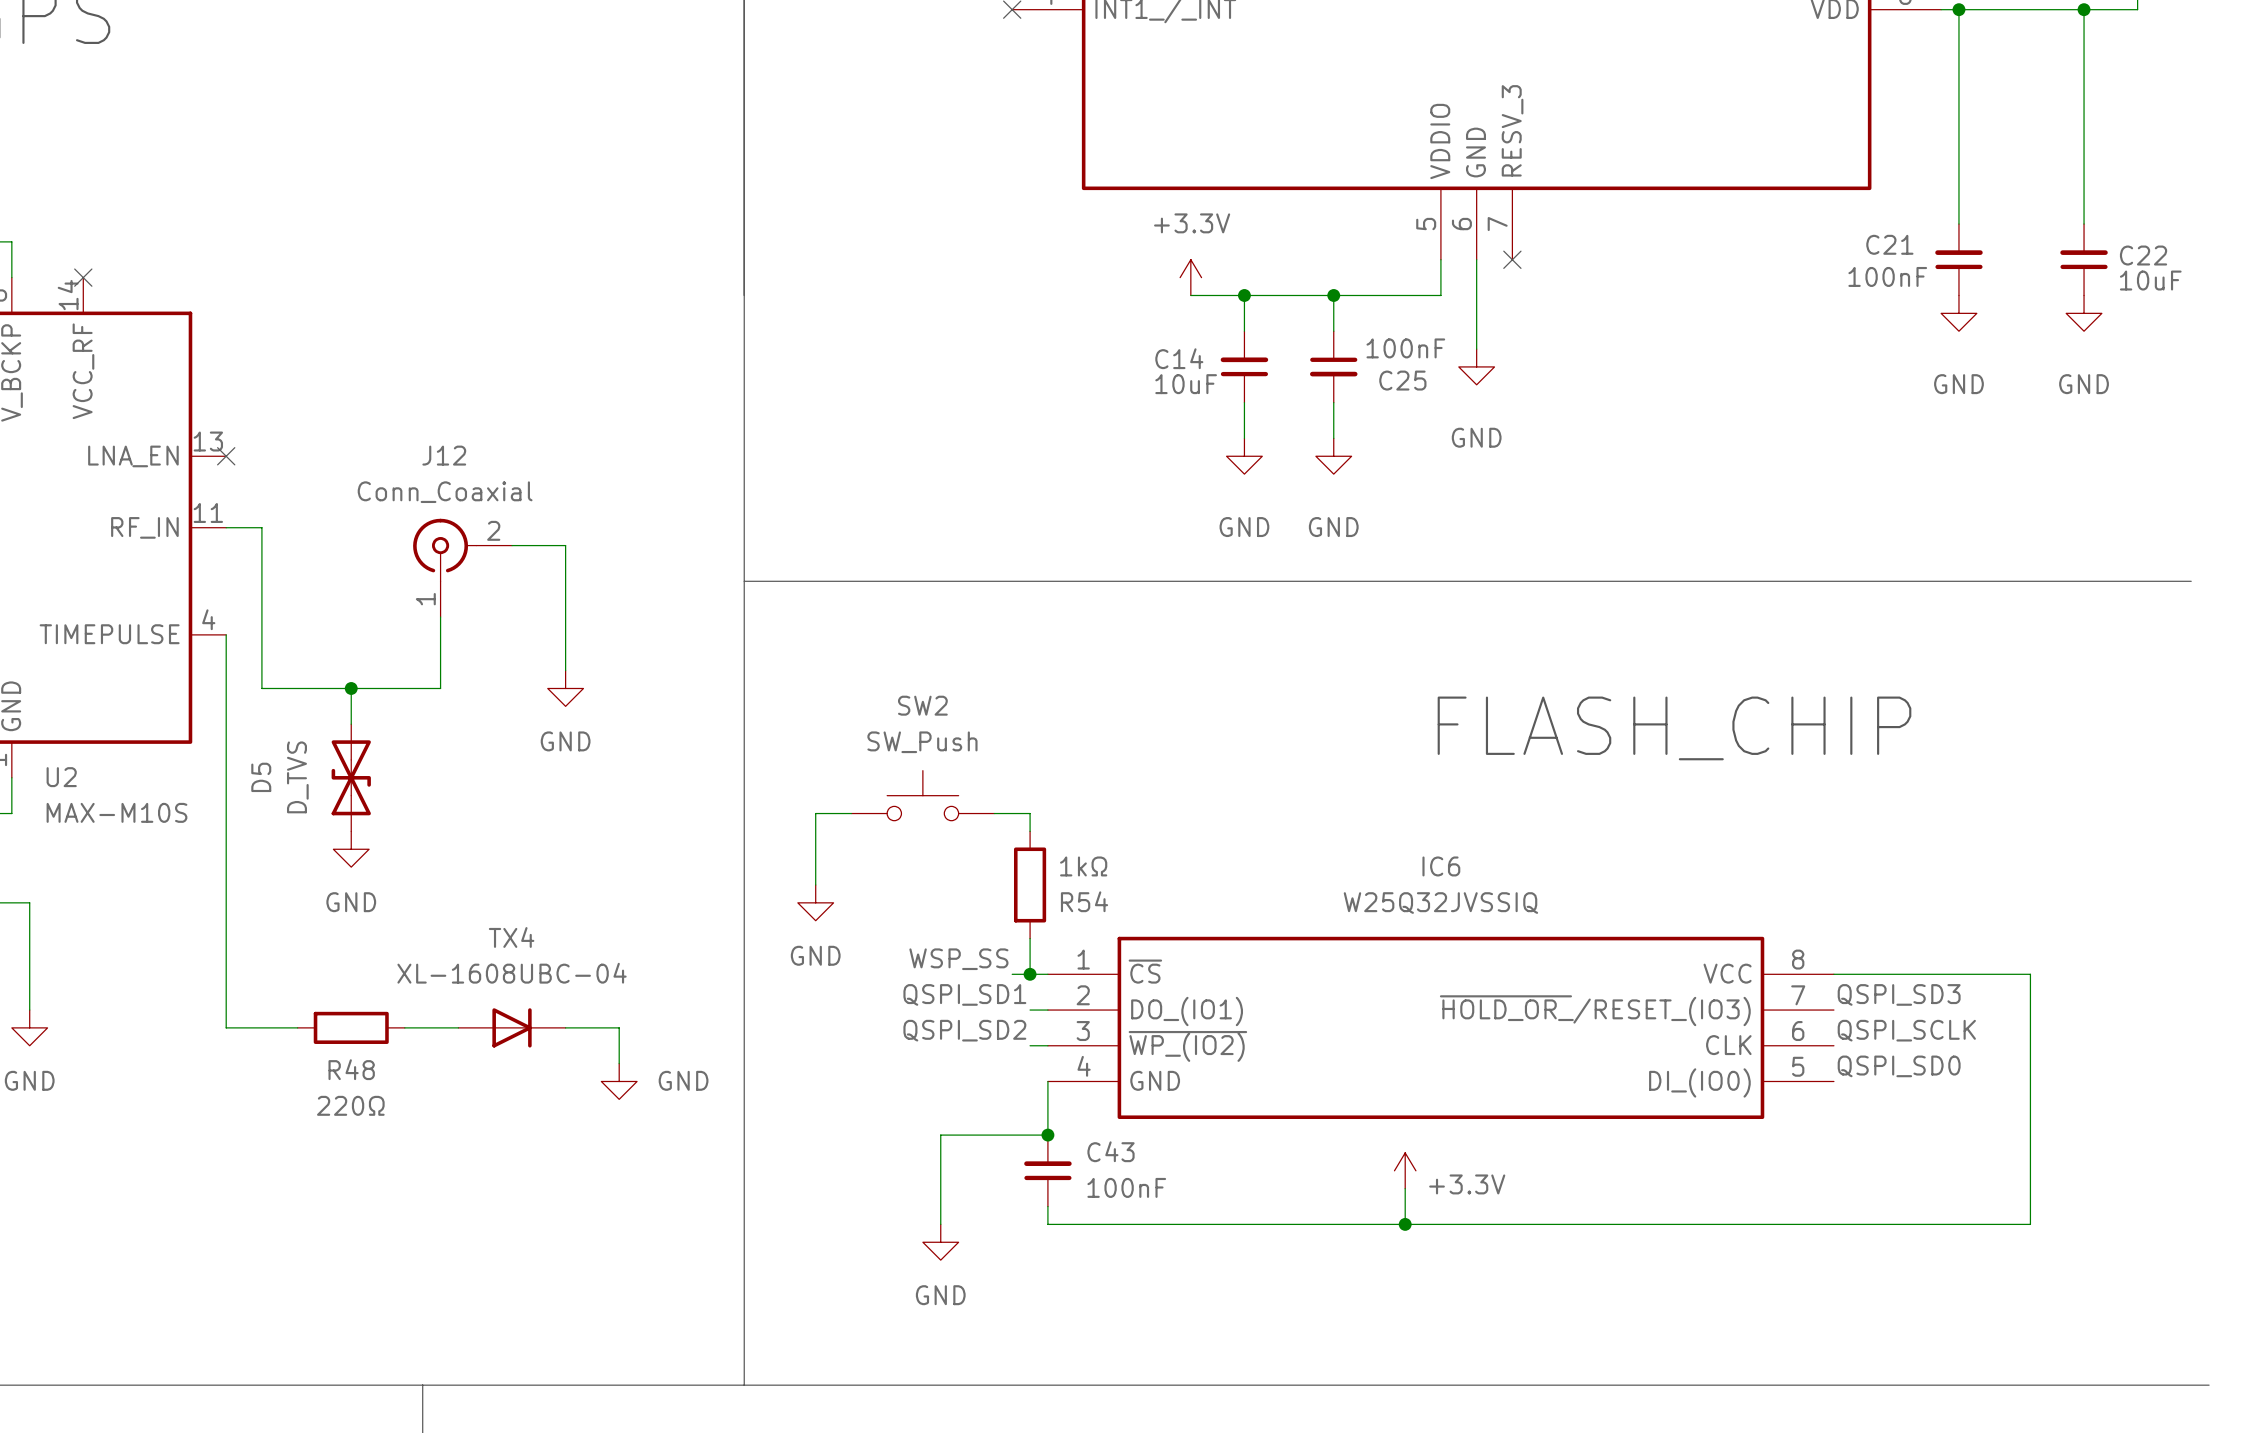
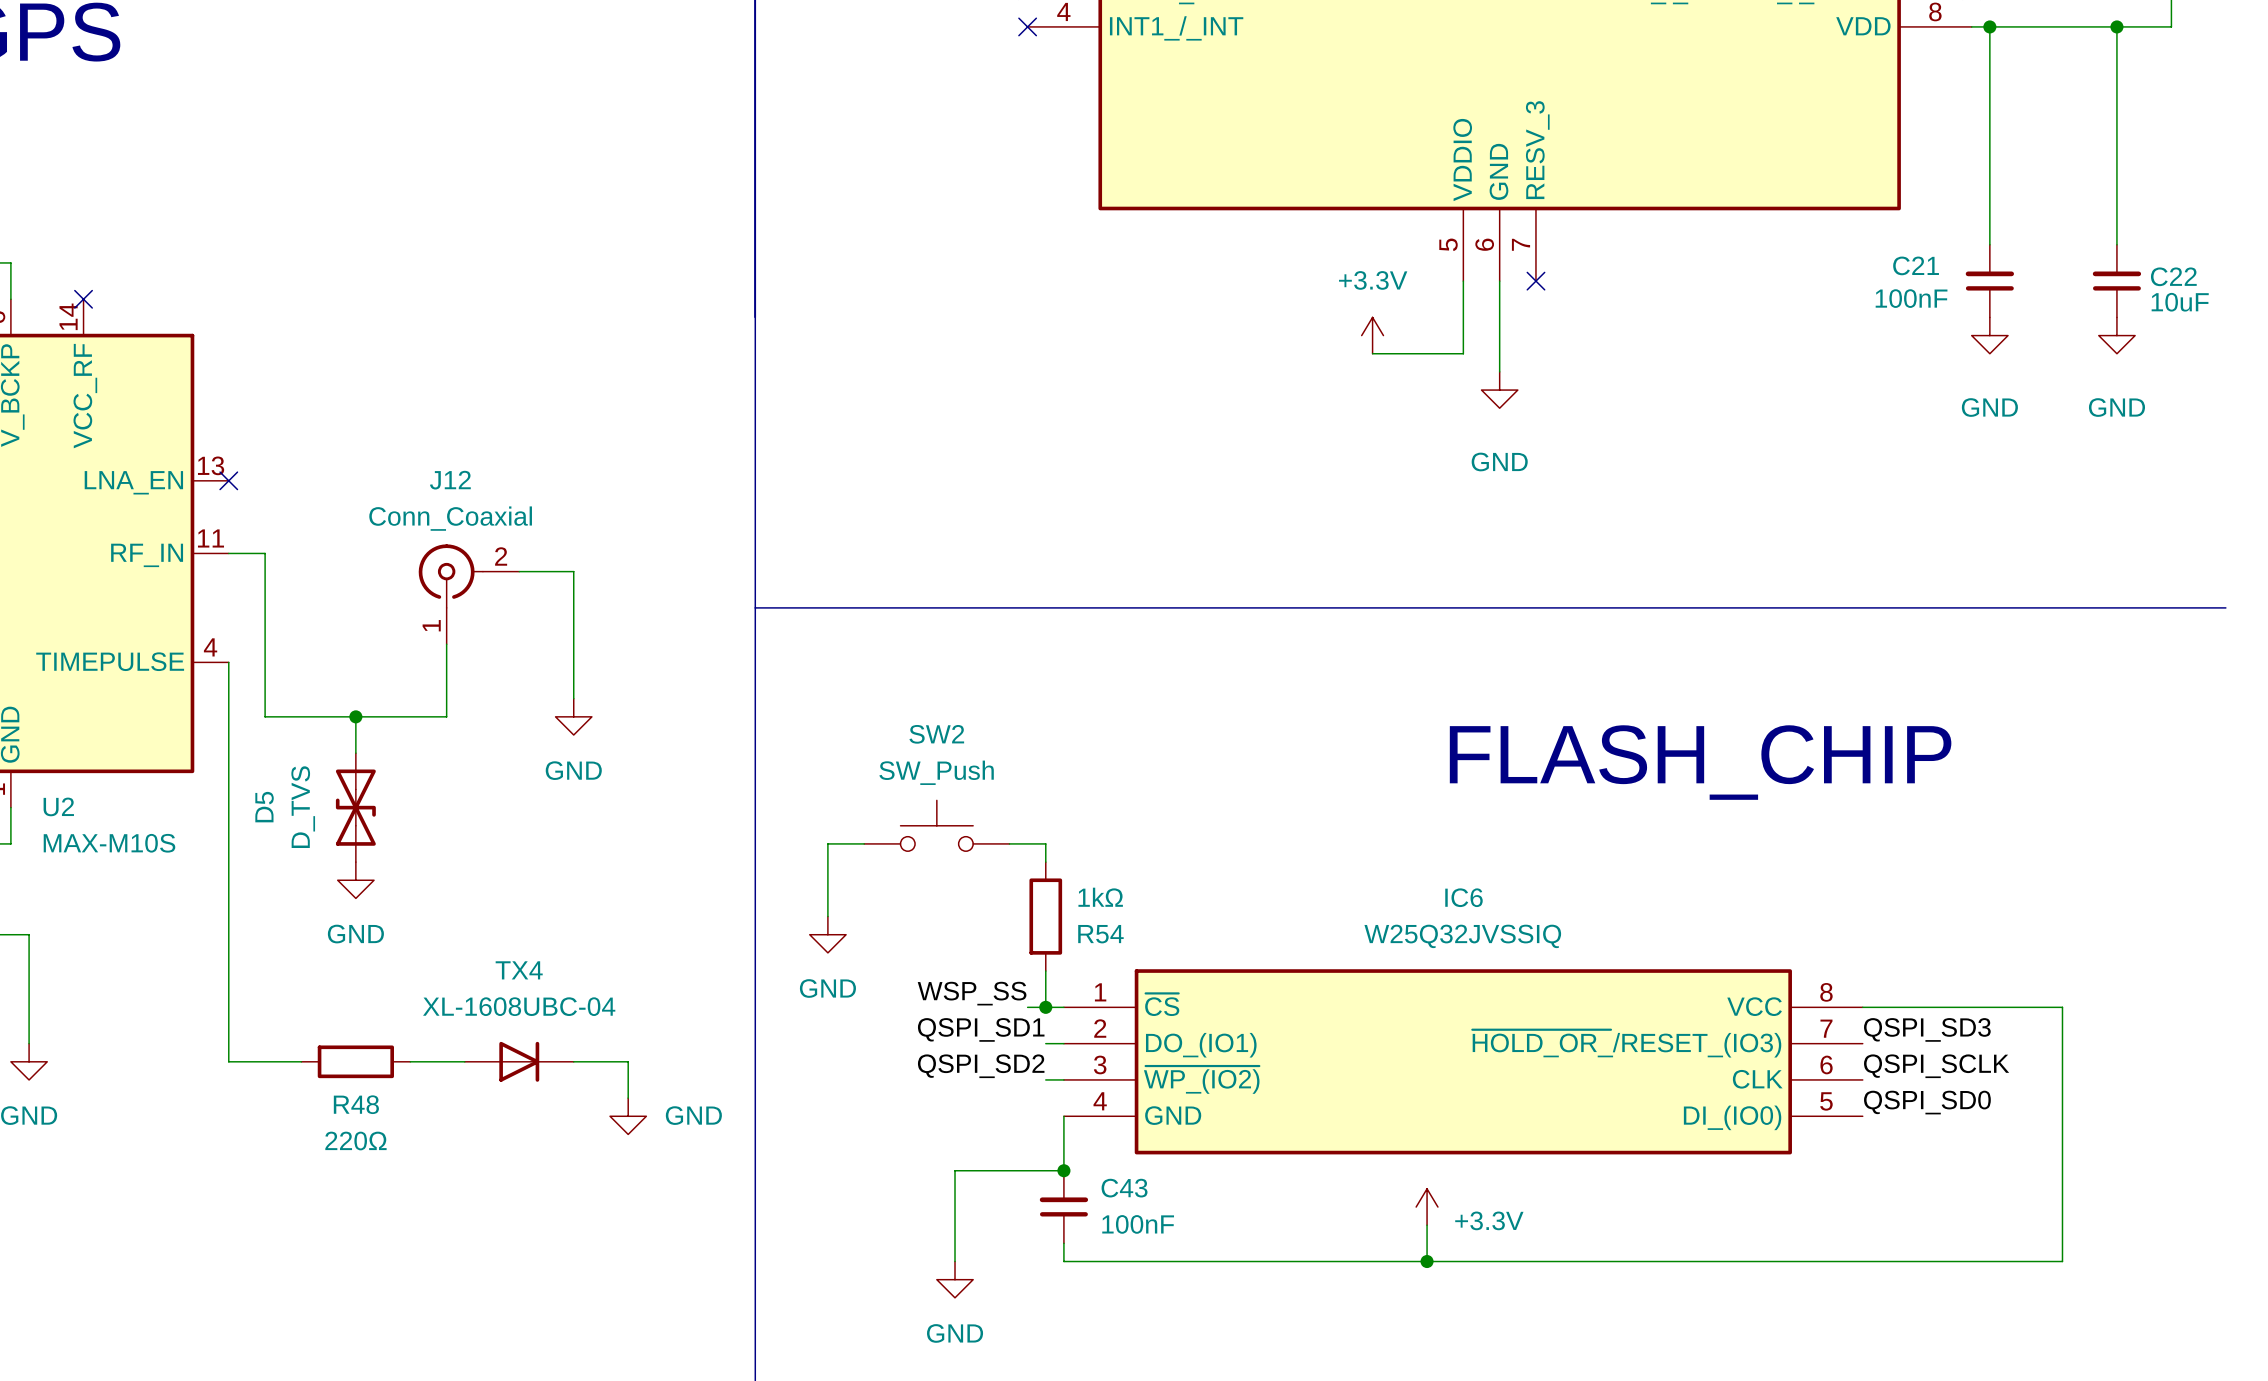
power symbol position: +3.3V (1190, 277) -> +3.3V (1372, 335)
wire: (1190, 295) (1440, 295) -> (1372, 353) (1463, 353) (1463, 317)
wire: (1244, 295) (1244, 331) -> none
junction: (1244, 295) -> none
wire: (1333, 295) (1333, 331) -> none
junction: (1333, 295) -> none
C14: 10uF (1244, 366) -> none
C25: 100nF (1333, 366) -> none
wire: (1244, 402) (1244, 438) -> none
wire: (1333, 402) (1333, 438) -> none
power symbol: GND (1244, 456) -> none
power symbol: GND (1333, 456) -> none

